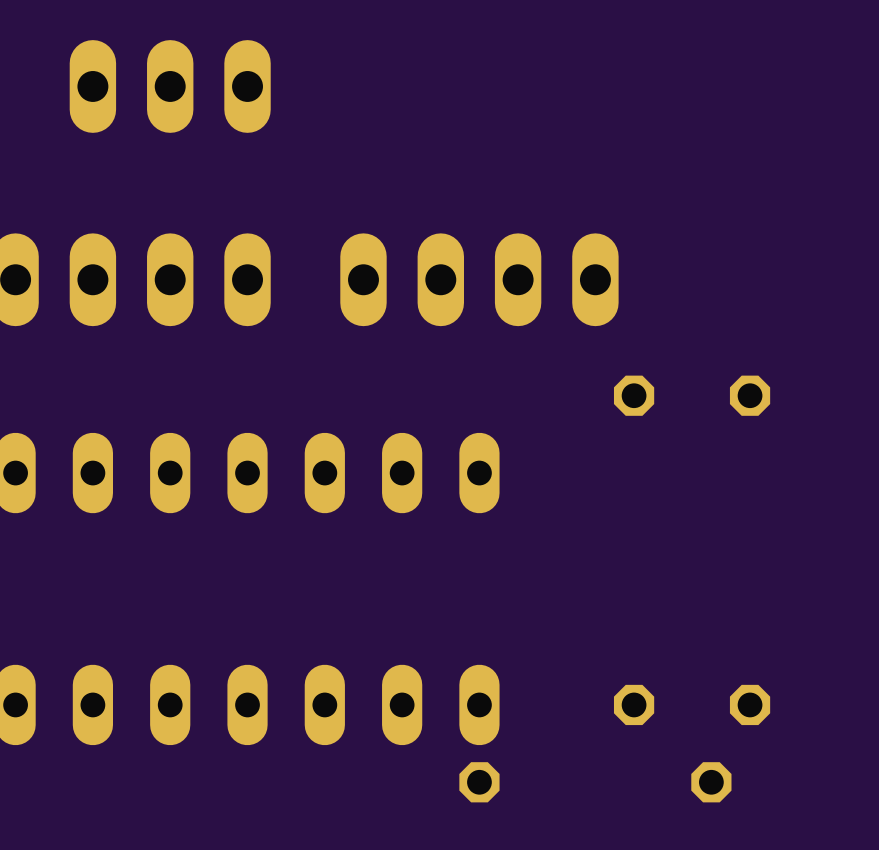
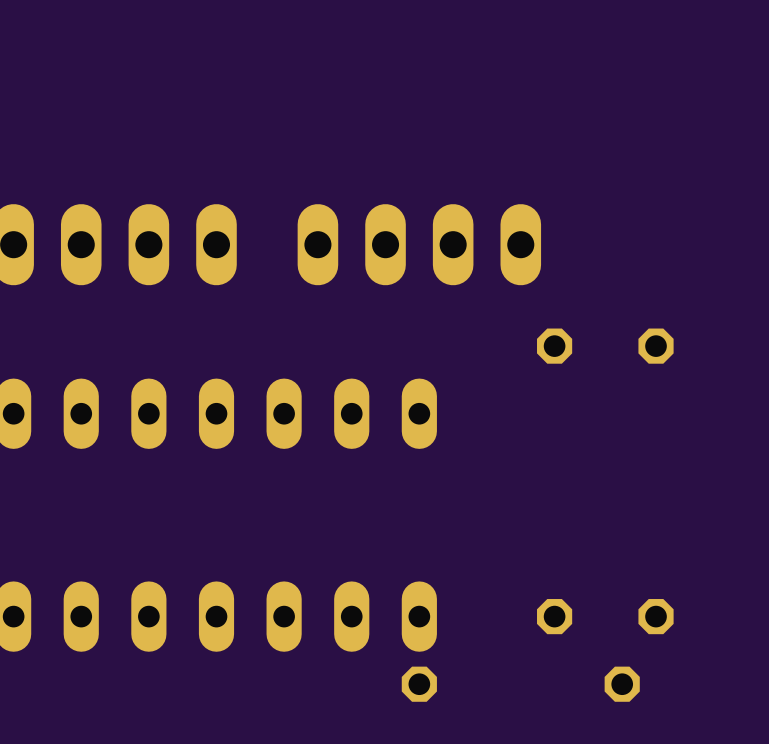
part: (170, 86) -> none

